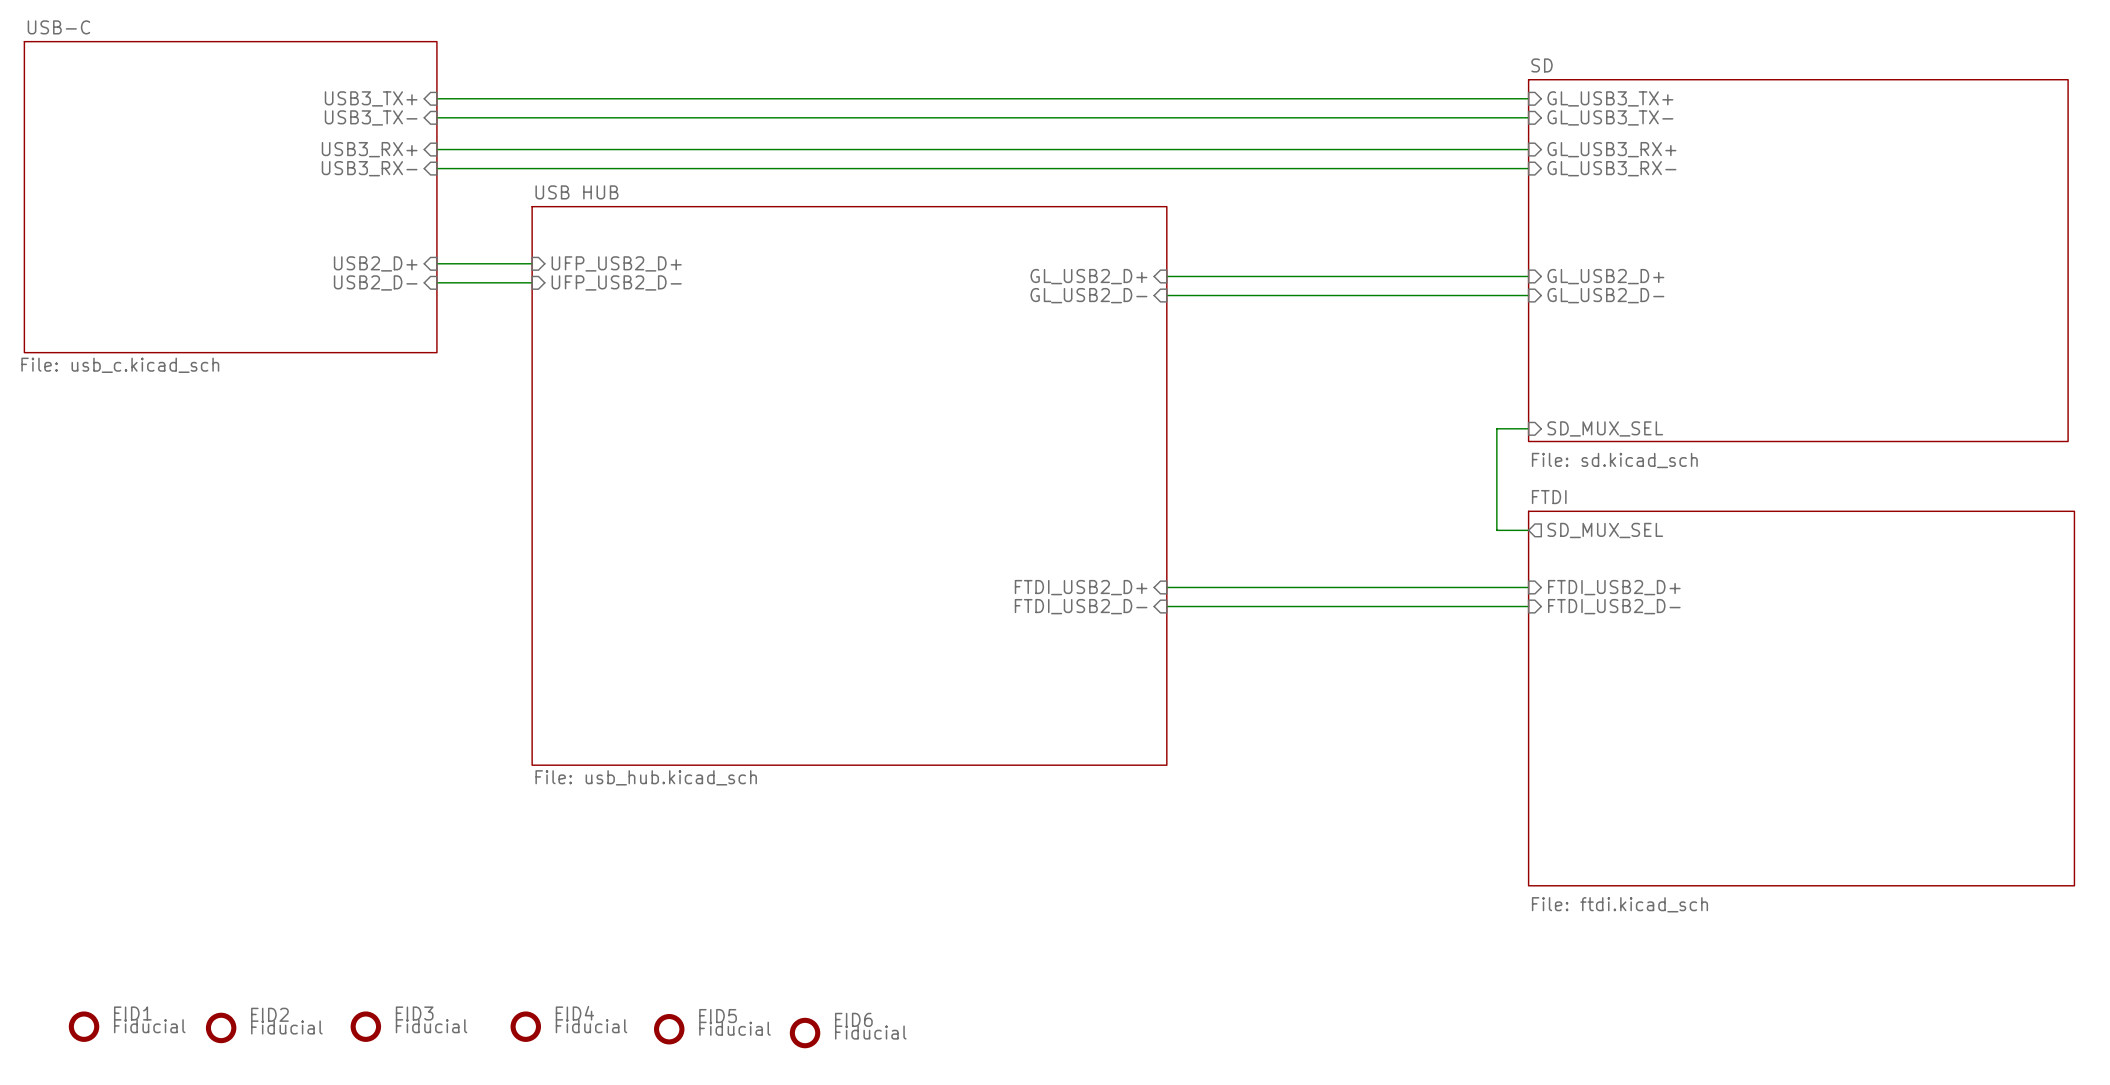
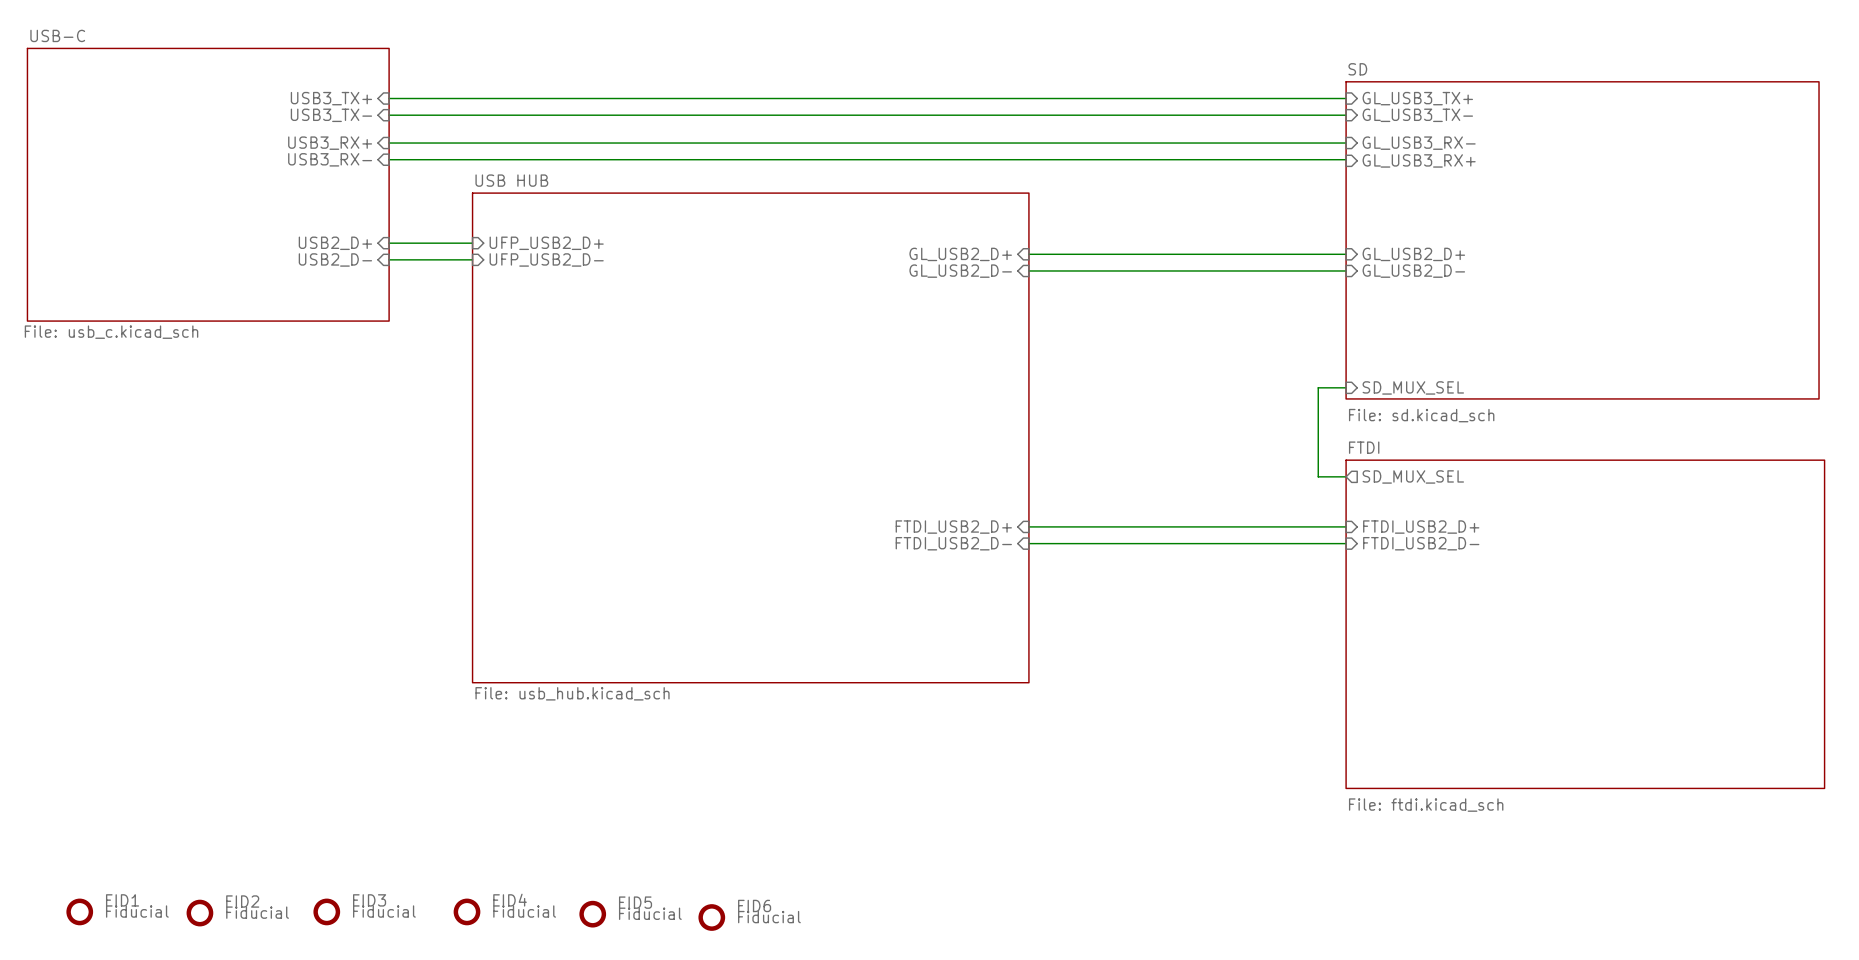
sheet pin: GL_USB3_RX+ (1611, 149) -> GL_USB3_RX- (1419, 143)
sheet pin: GL_USB3_RX- (1611, 168) -> GL_USB3_RX+ (1419, 160)

